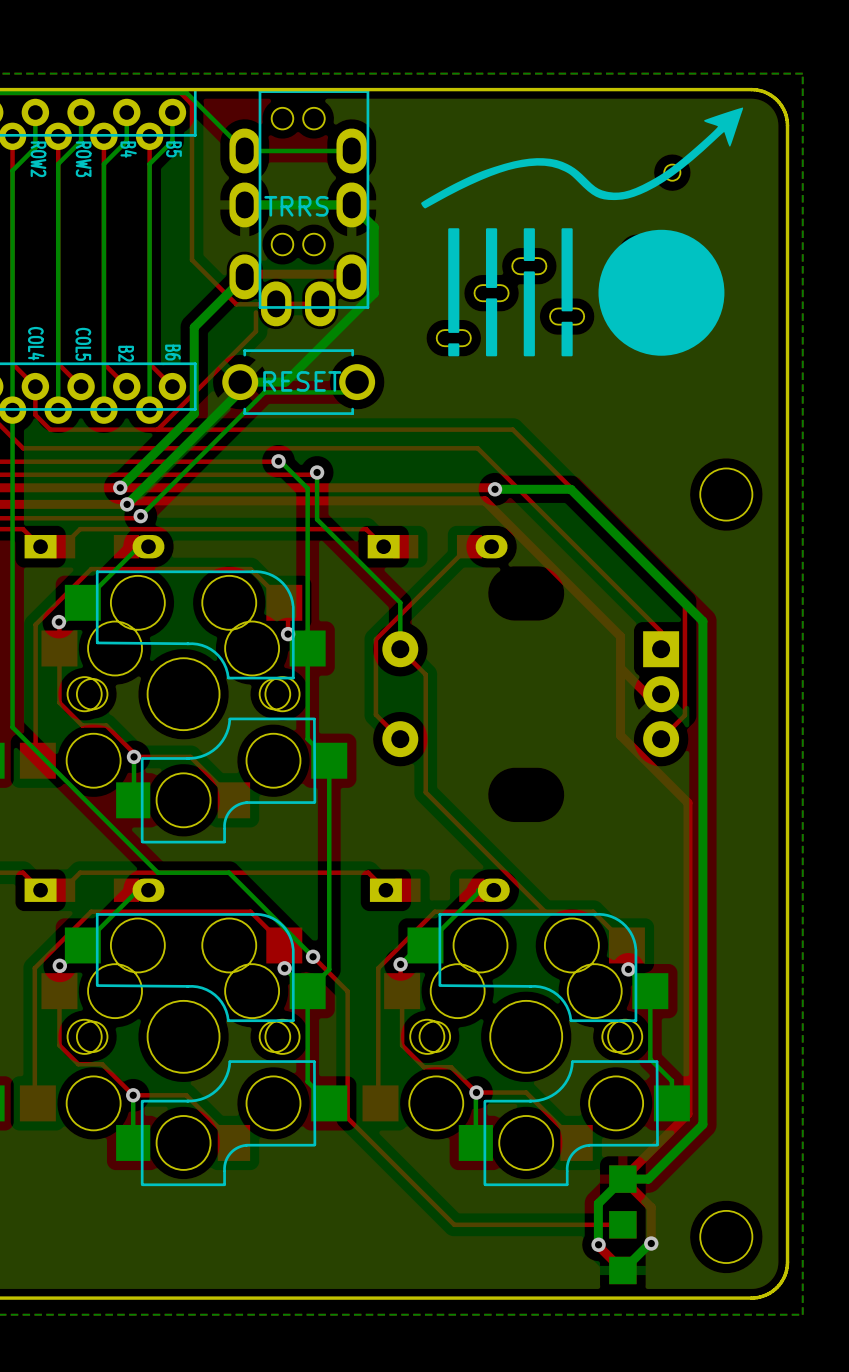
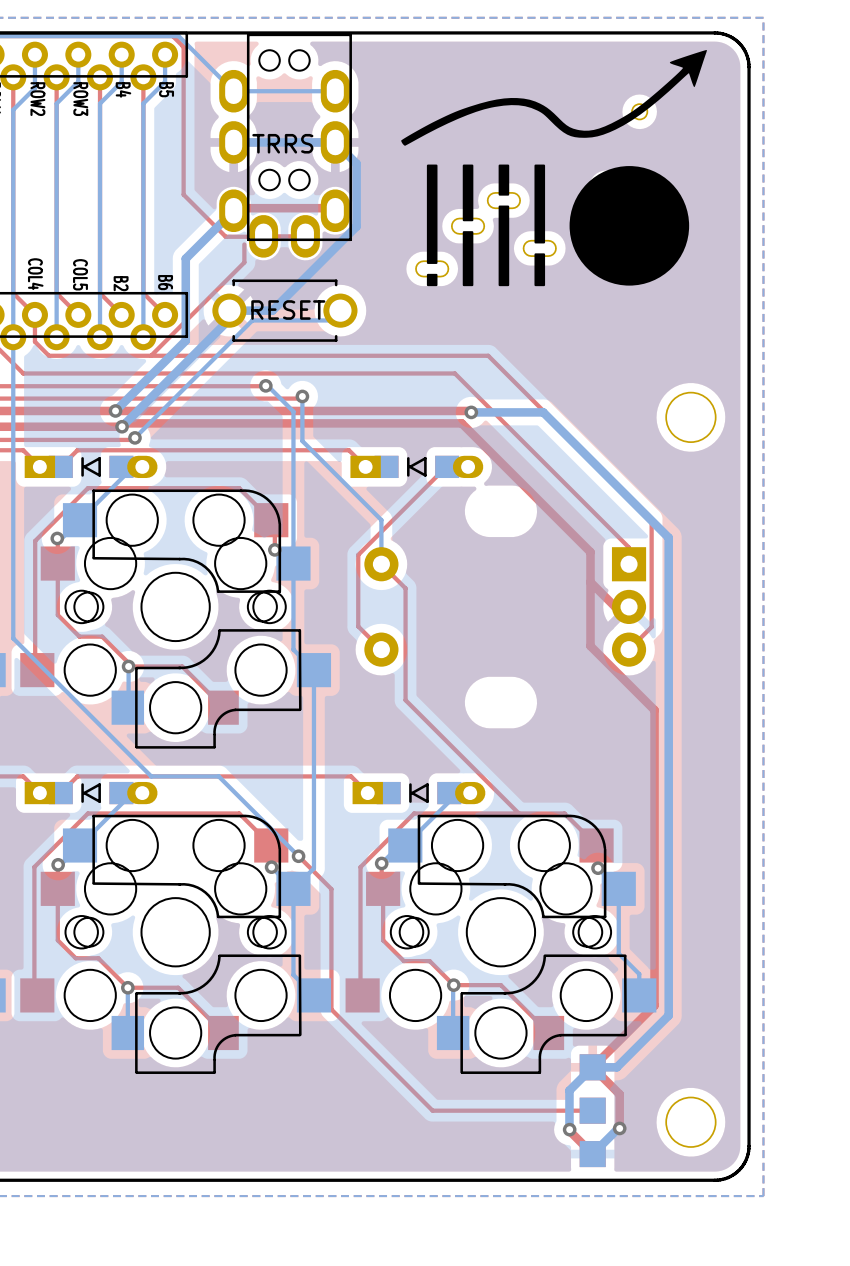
part footprint: [24, 535, 165, 559] -> [24, 455, 158, 479]
part footprint: [367, 535, 508, 559] -> [350, 455, 484, 479]
part footprint: [24, 878, 165, 902] -> [24, 781, 158, 805]
part footprint: [369, 878, 510, 902] -> [352, 781, 486, 805]

